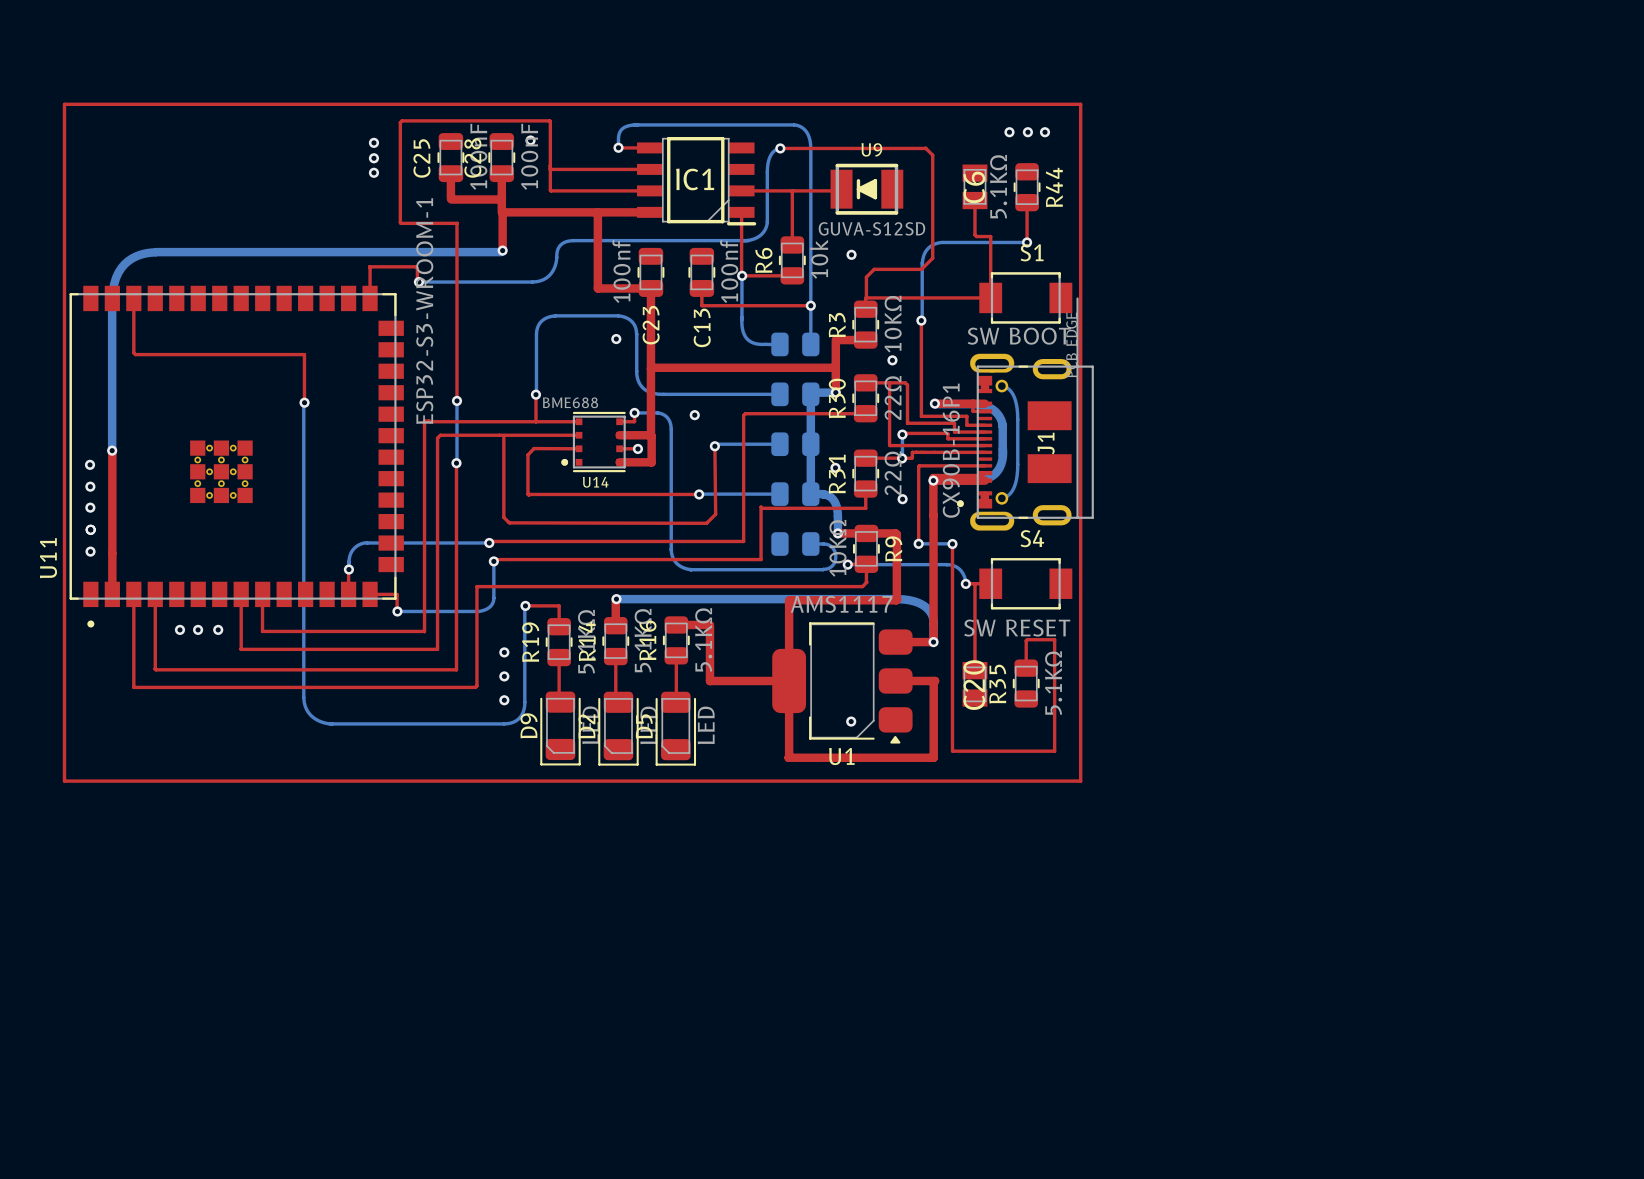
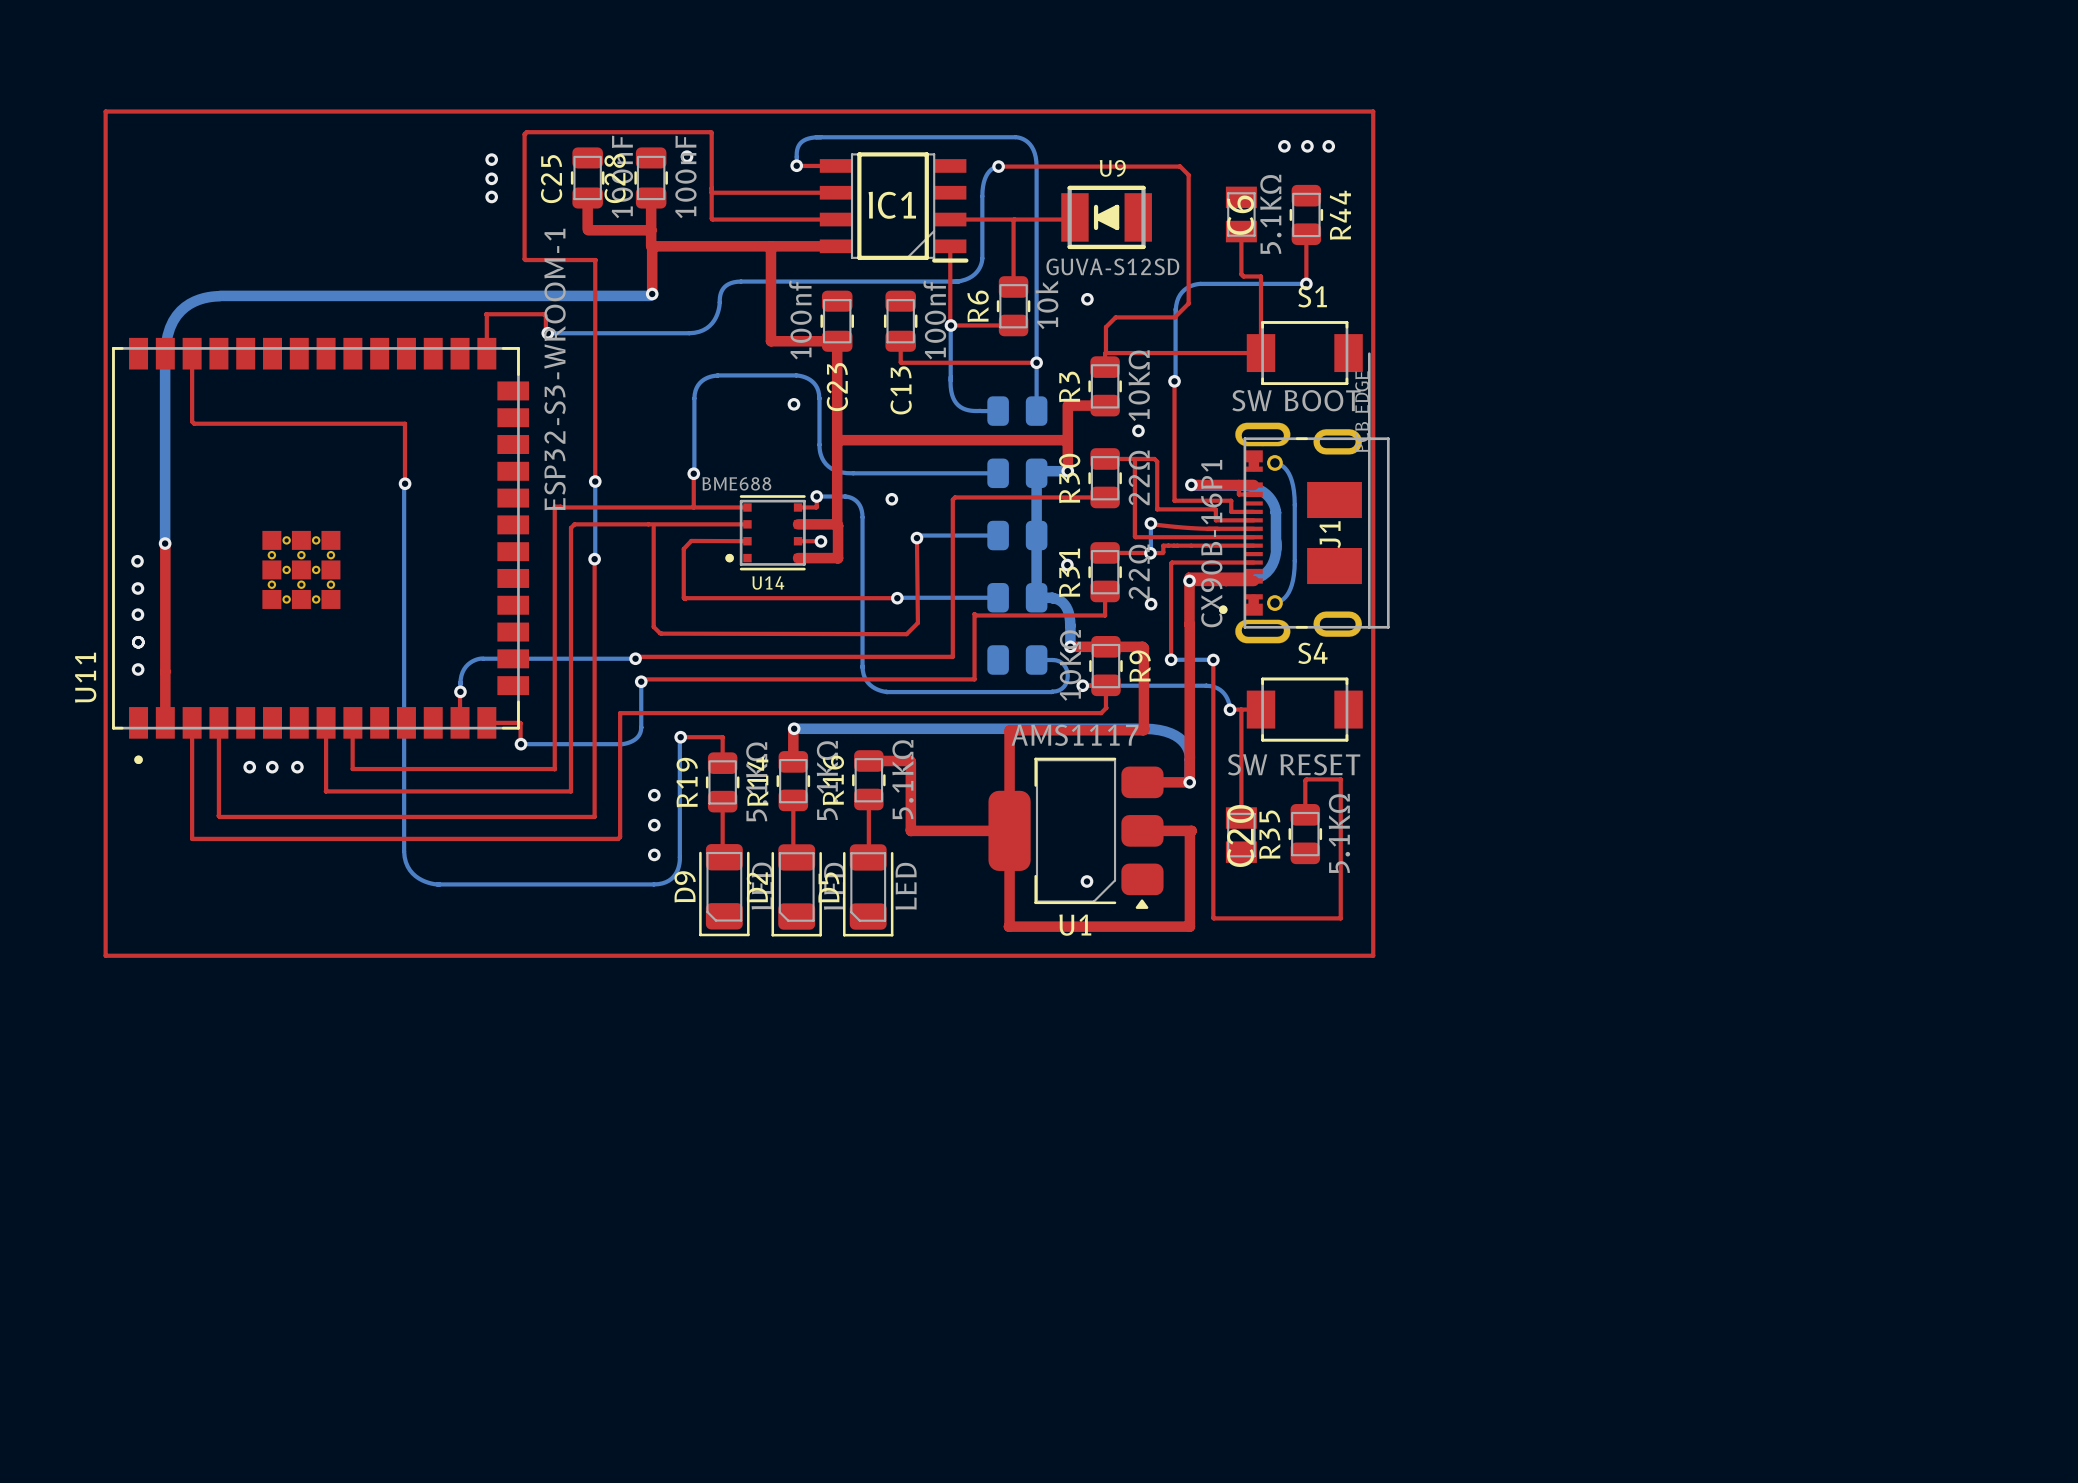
top track: (905, 434) (947, 433) (948, 438) -> none
top track: none -> (1151, 524) (1217, 528)

